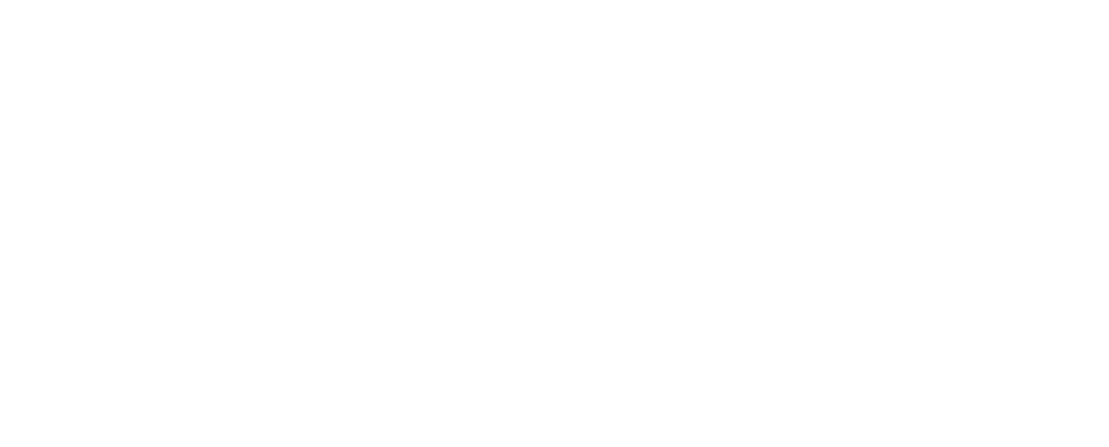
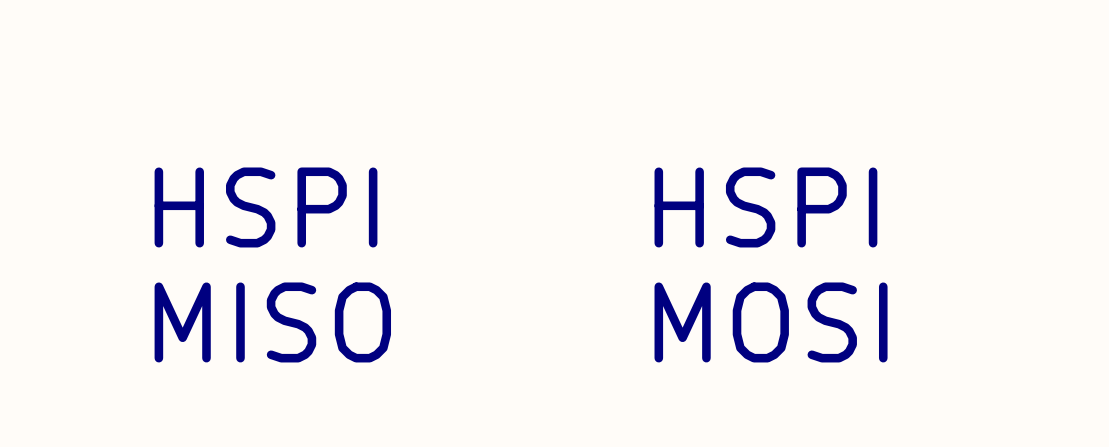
text: none -> HSPI (266, 207)
text: none -> HSPI (765, 207)
text: none -> MISO (272, 322)
text: none -> MOSI (771, 322)

